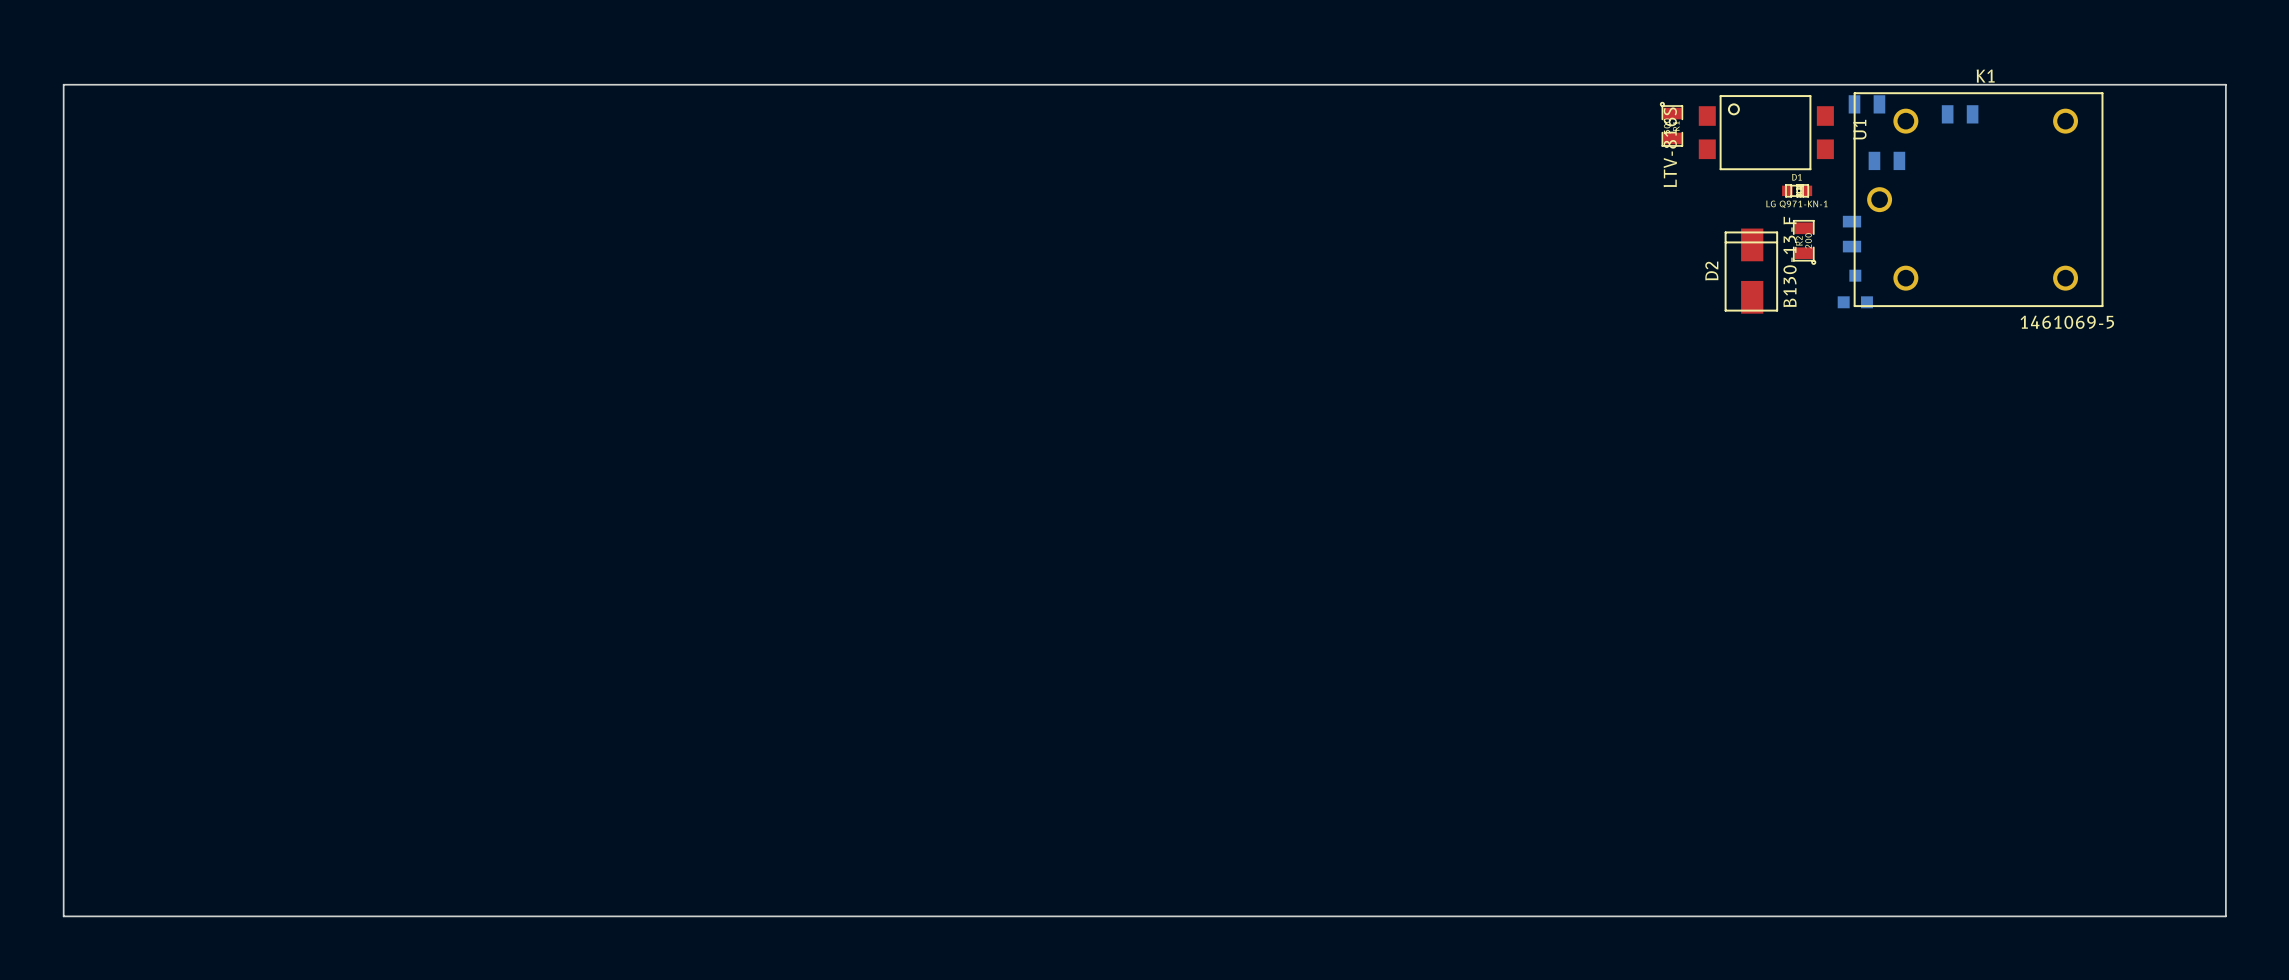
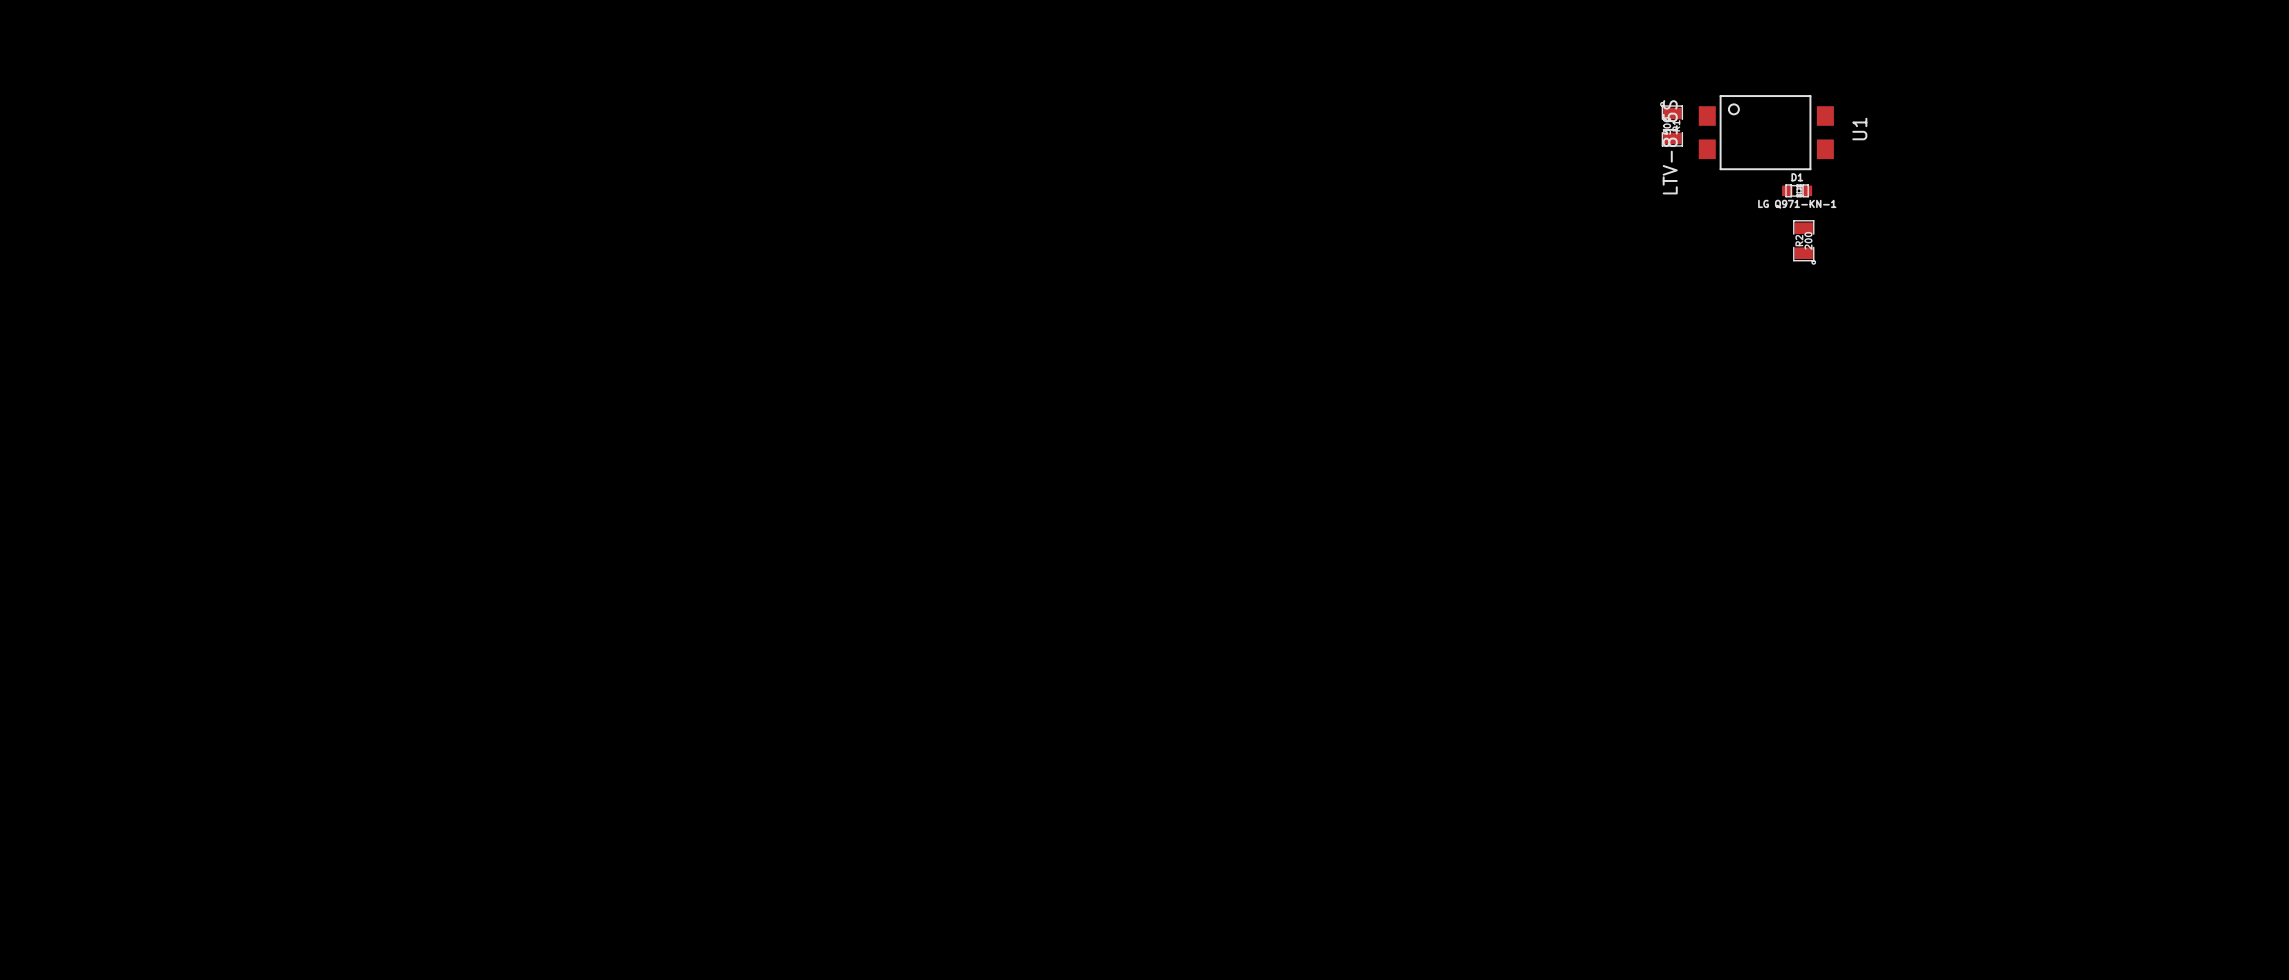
board edge: (63, 84) (63, 916) (2225, 916) (2225, 84) (63, 84) -> none
part: (1866, 104) -> none
part: (1960, 114) -> none
part: (1886, 160) -> none
K1: 1461069-5 (1978, 199) -> none
part: (1852, 234) -> none
D2: B130-13-F (1751, 271) -> none
part: (1855, 288) -> none

